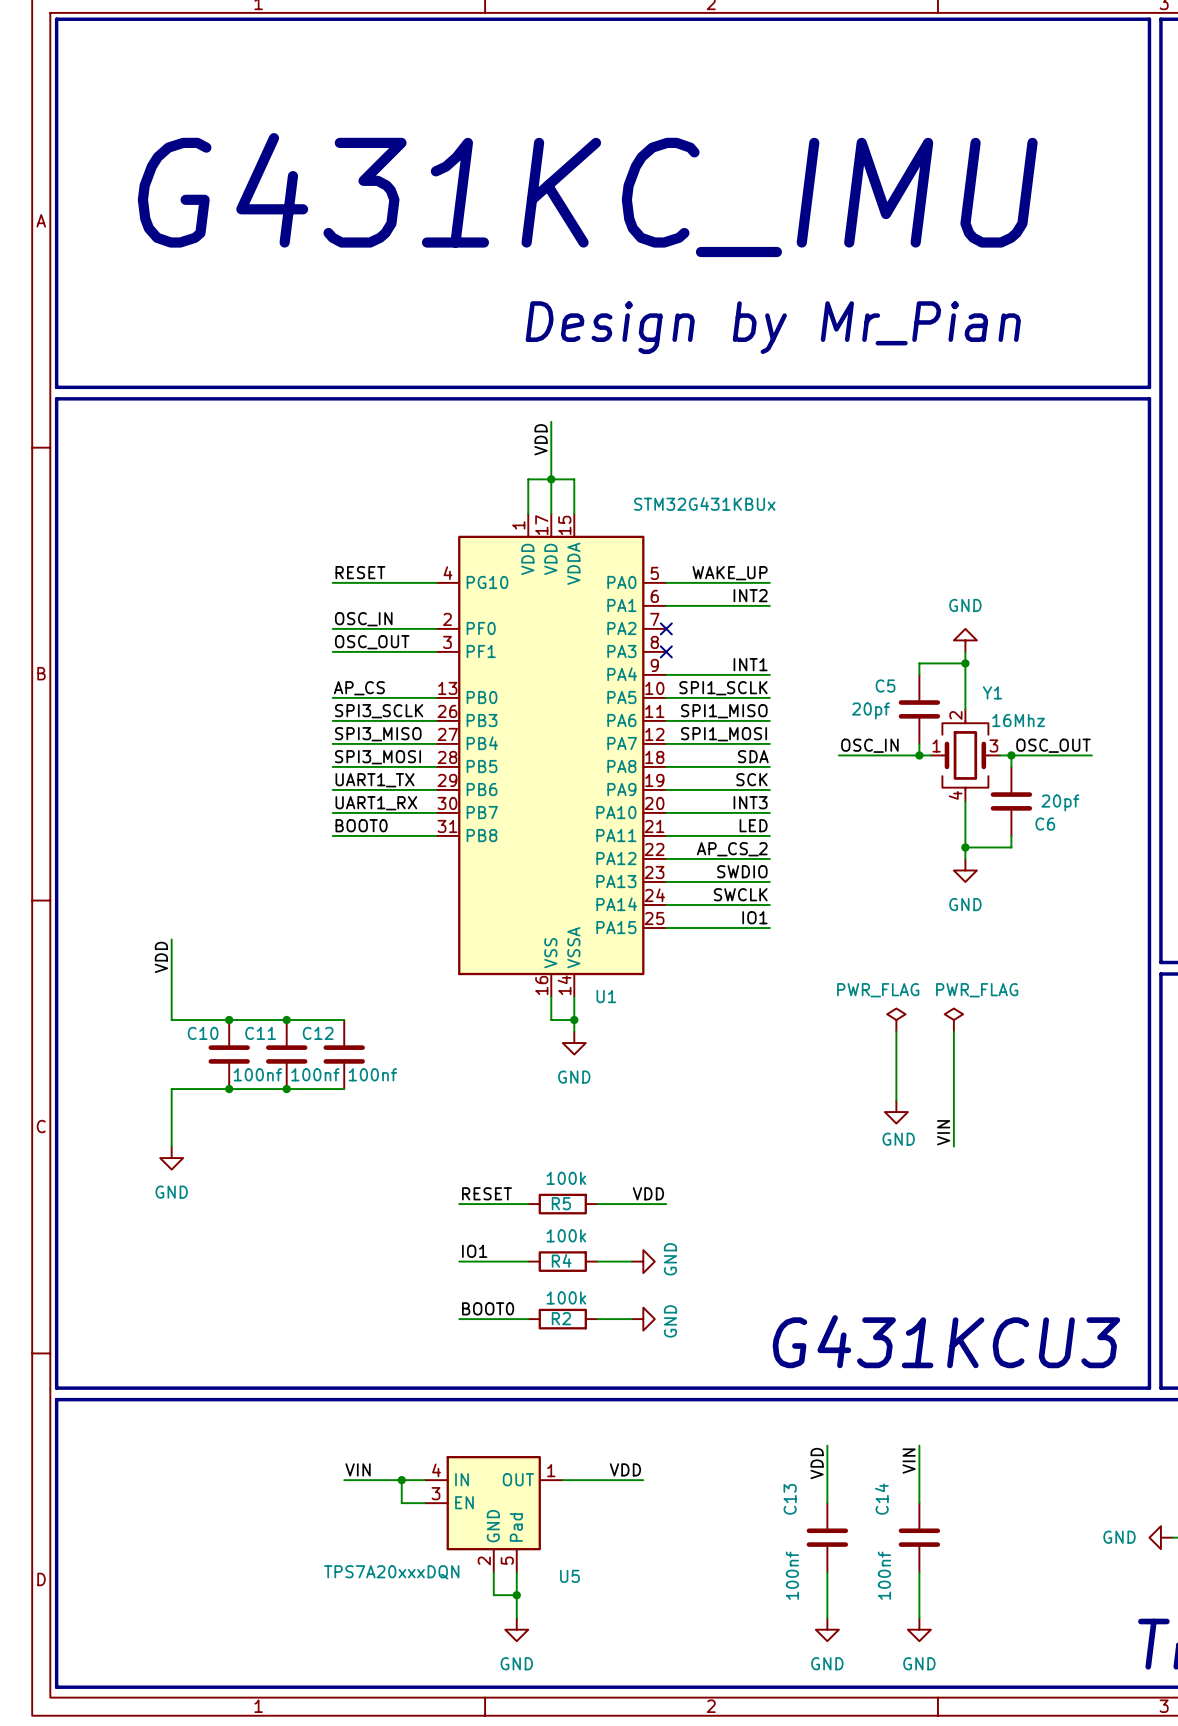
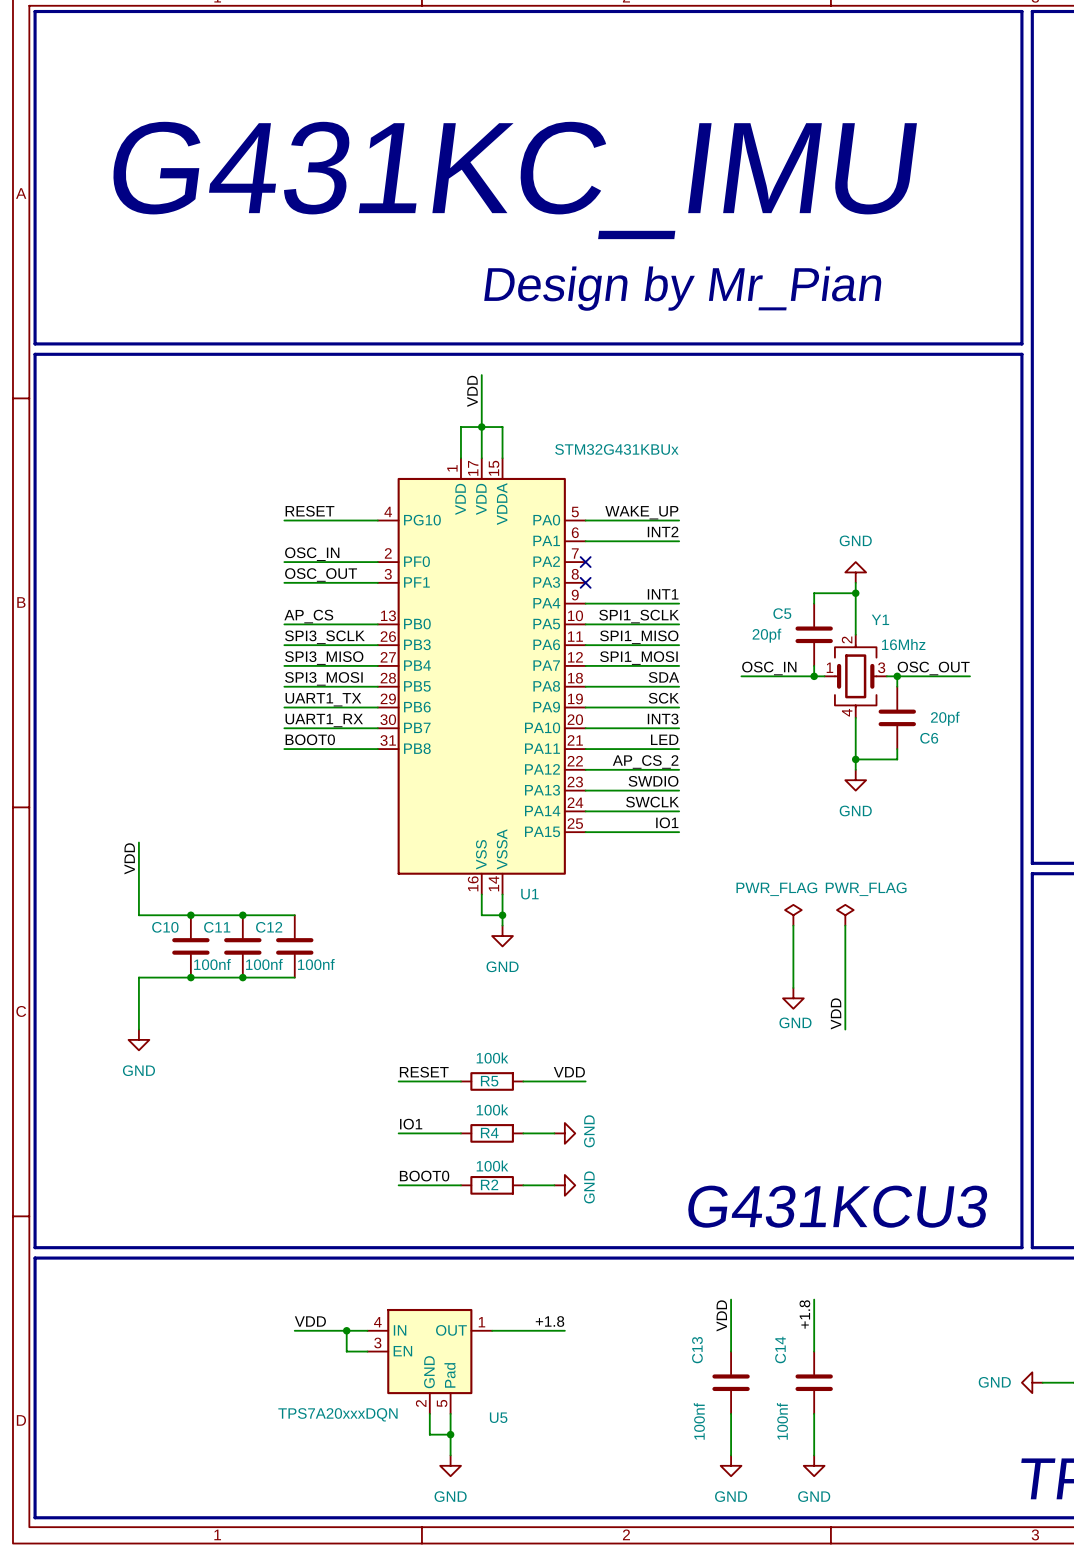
label: VIN (943, 1132) -> VDD (836, 1013)
label: VIN (909, 1461) -> +1.8 (804, 1314)
label: VIN (358, 1469) -> VDD (310, 1321)
label: VDD (625, 1469) -> +1.8 (549, 1321)

